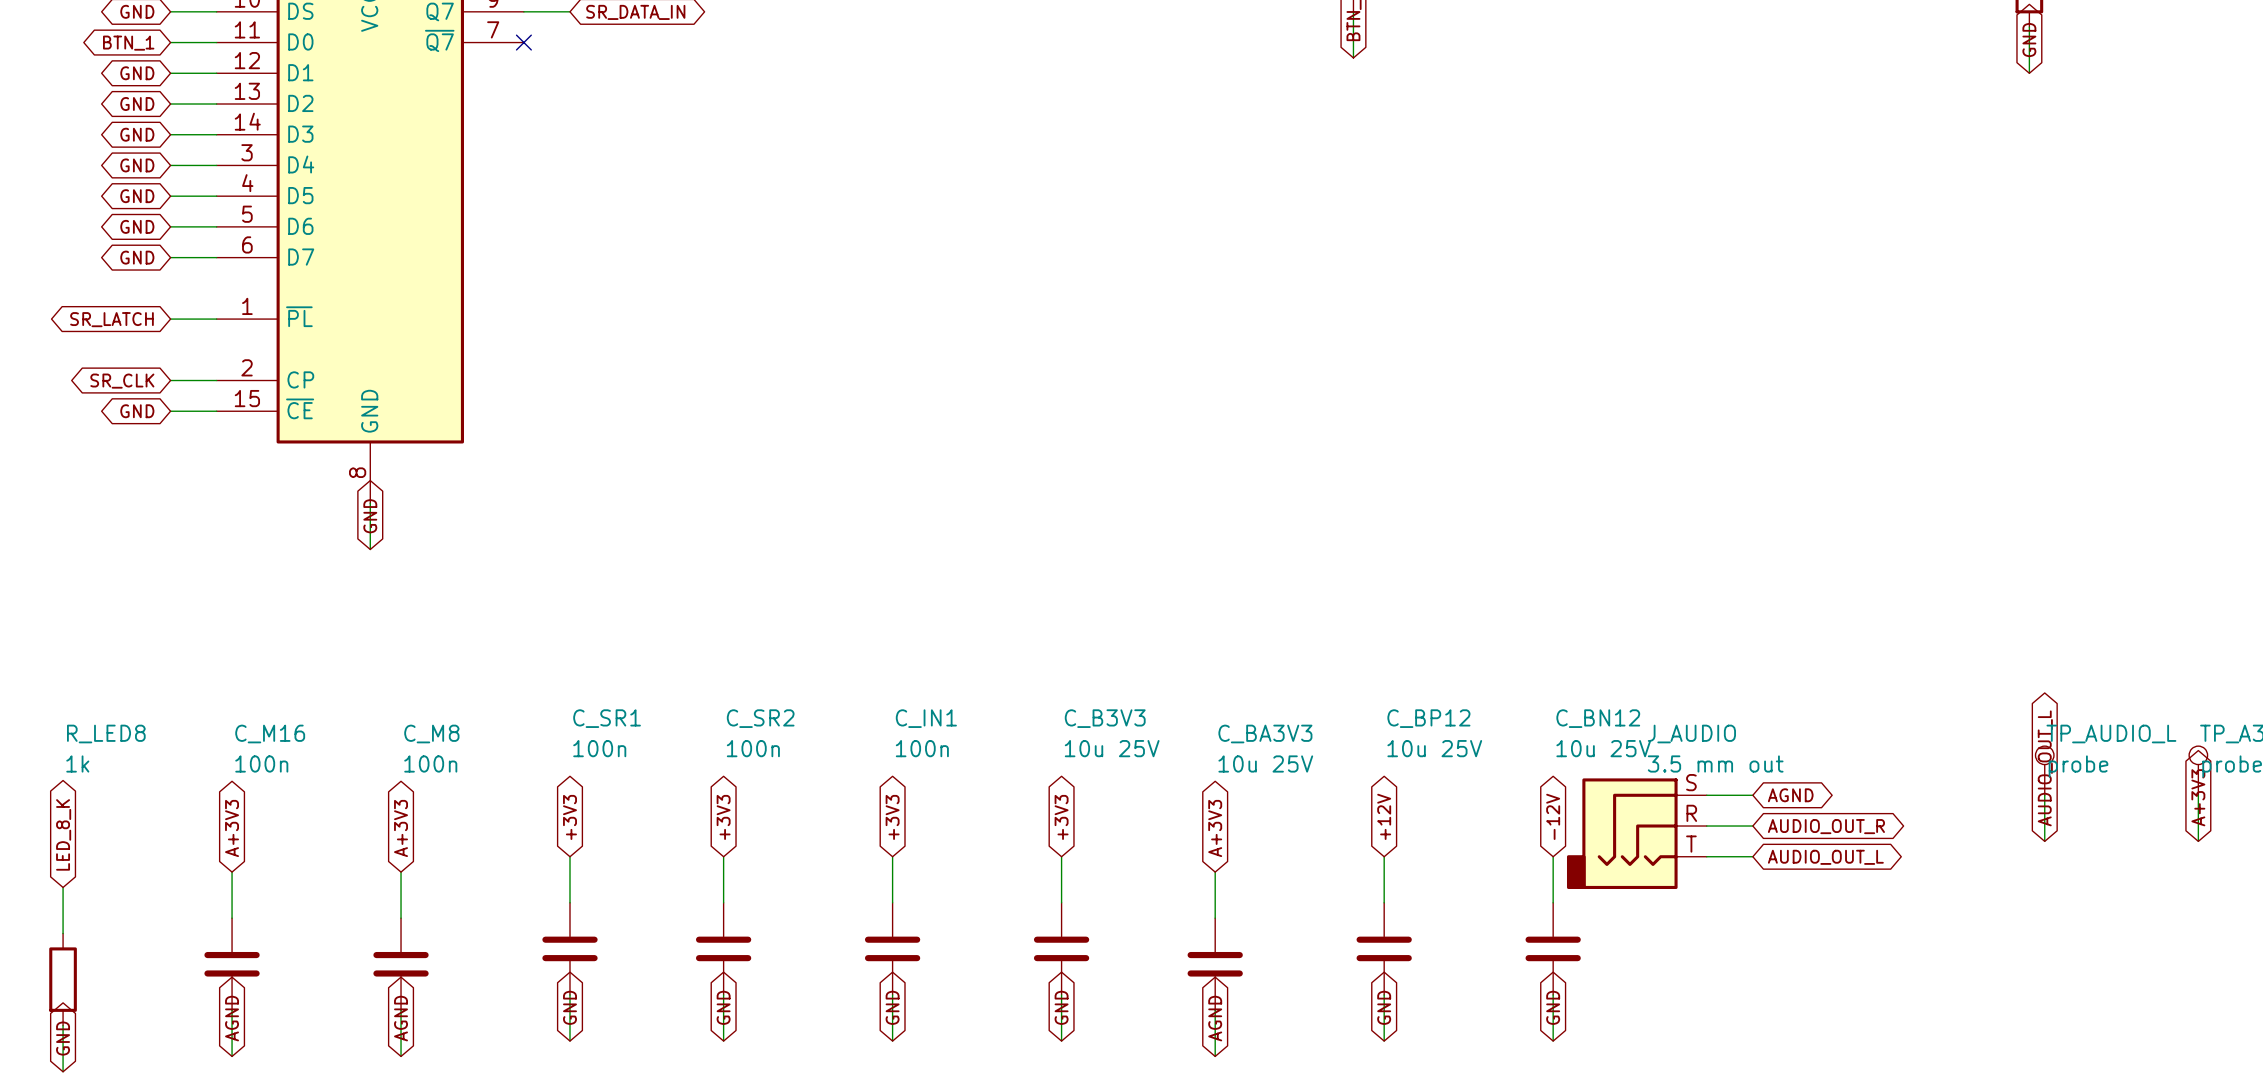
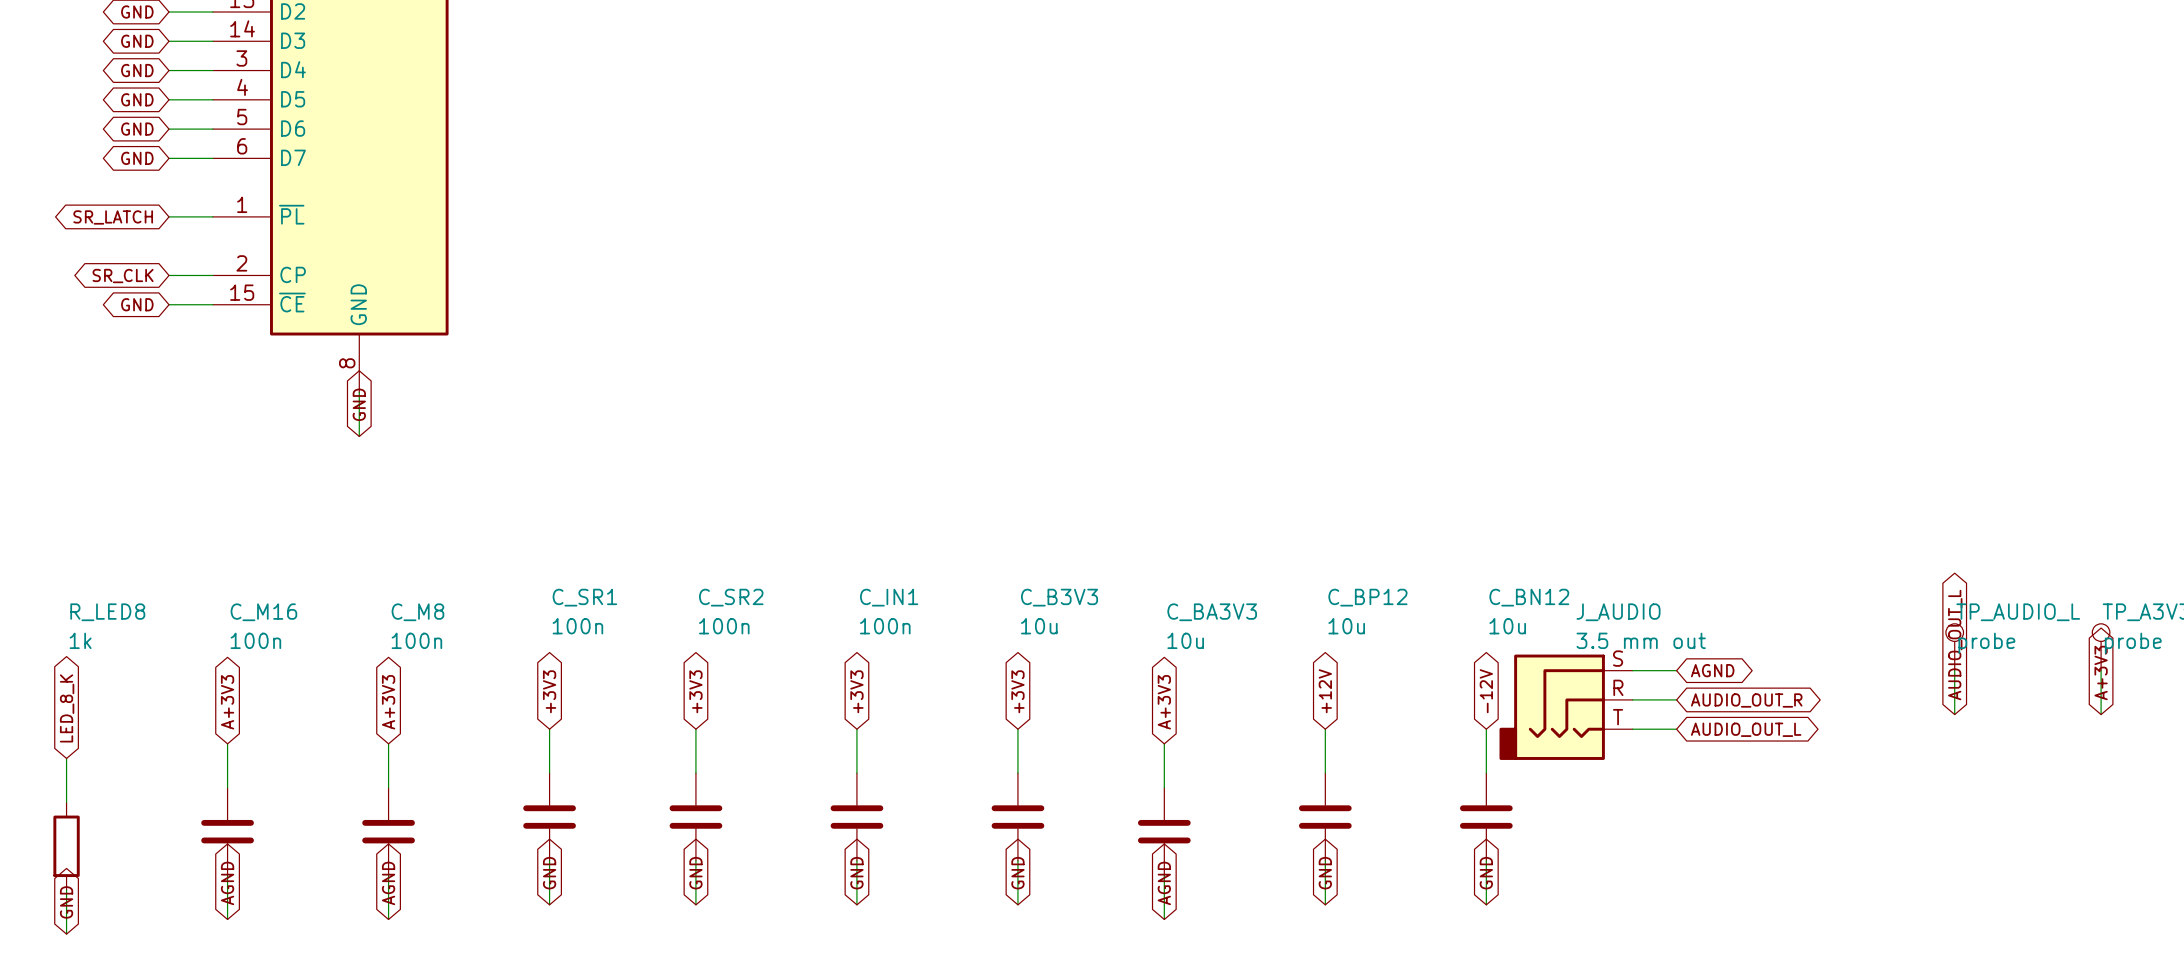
C_B3V3 value: 10u 25V (1112, 748) -> 10u (1039, 626)
C_BP12 value: 10u 25V (1434, 748) -> 10u (1346, 626)
C_BN12 value: 10u 25V (1603, 748) -> 10u (1507, 626)
C_BA3V3 value: 10u 25V (1265, 763) -> 10u (1185, 640)

